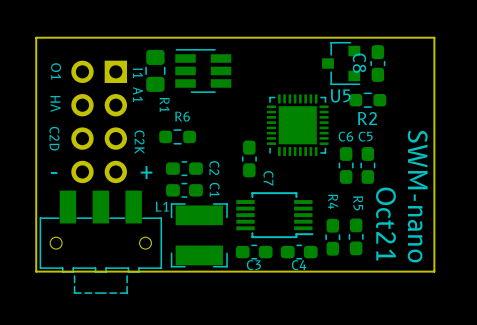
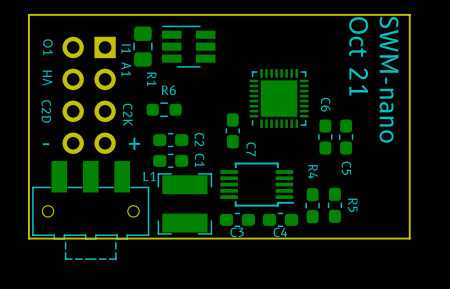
U5: (341, 63) -> none
C8: (377, 63) -> none
R2: (367, 100) -> none
C6 name rotation: 0° (345, 136) -> 90° clockwise (325, 104)
C5 name rotation: 0° (365, 136) -> 90° clockwise (346, 168)
C5 name position: C5 (365, 136) -> C5 (346, 168)
text position: SWM-nano (417, 196) -> SWM-nano (389, 79)
R5 name position: R5 (358, 203) -> R5 (352, 205)
text: Oct21 (385, 224) -> Oct 21 (358, 56)

